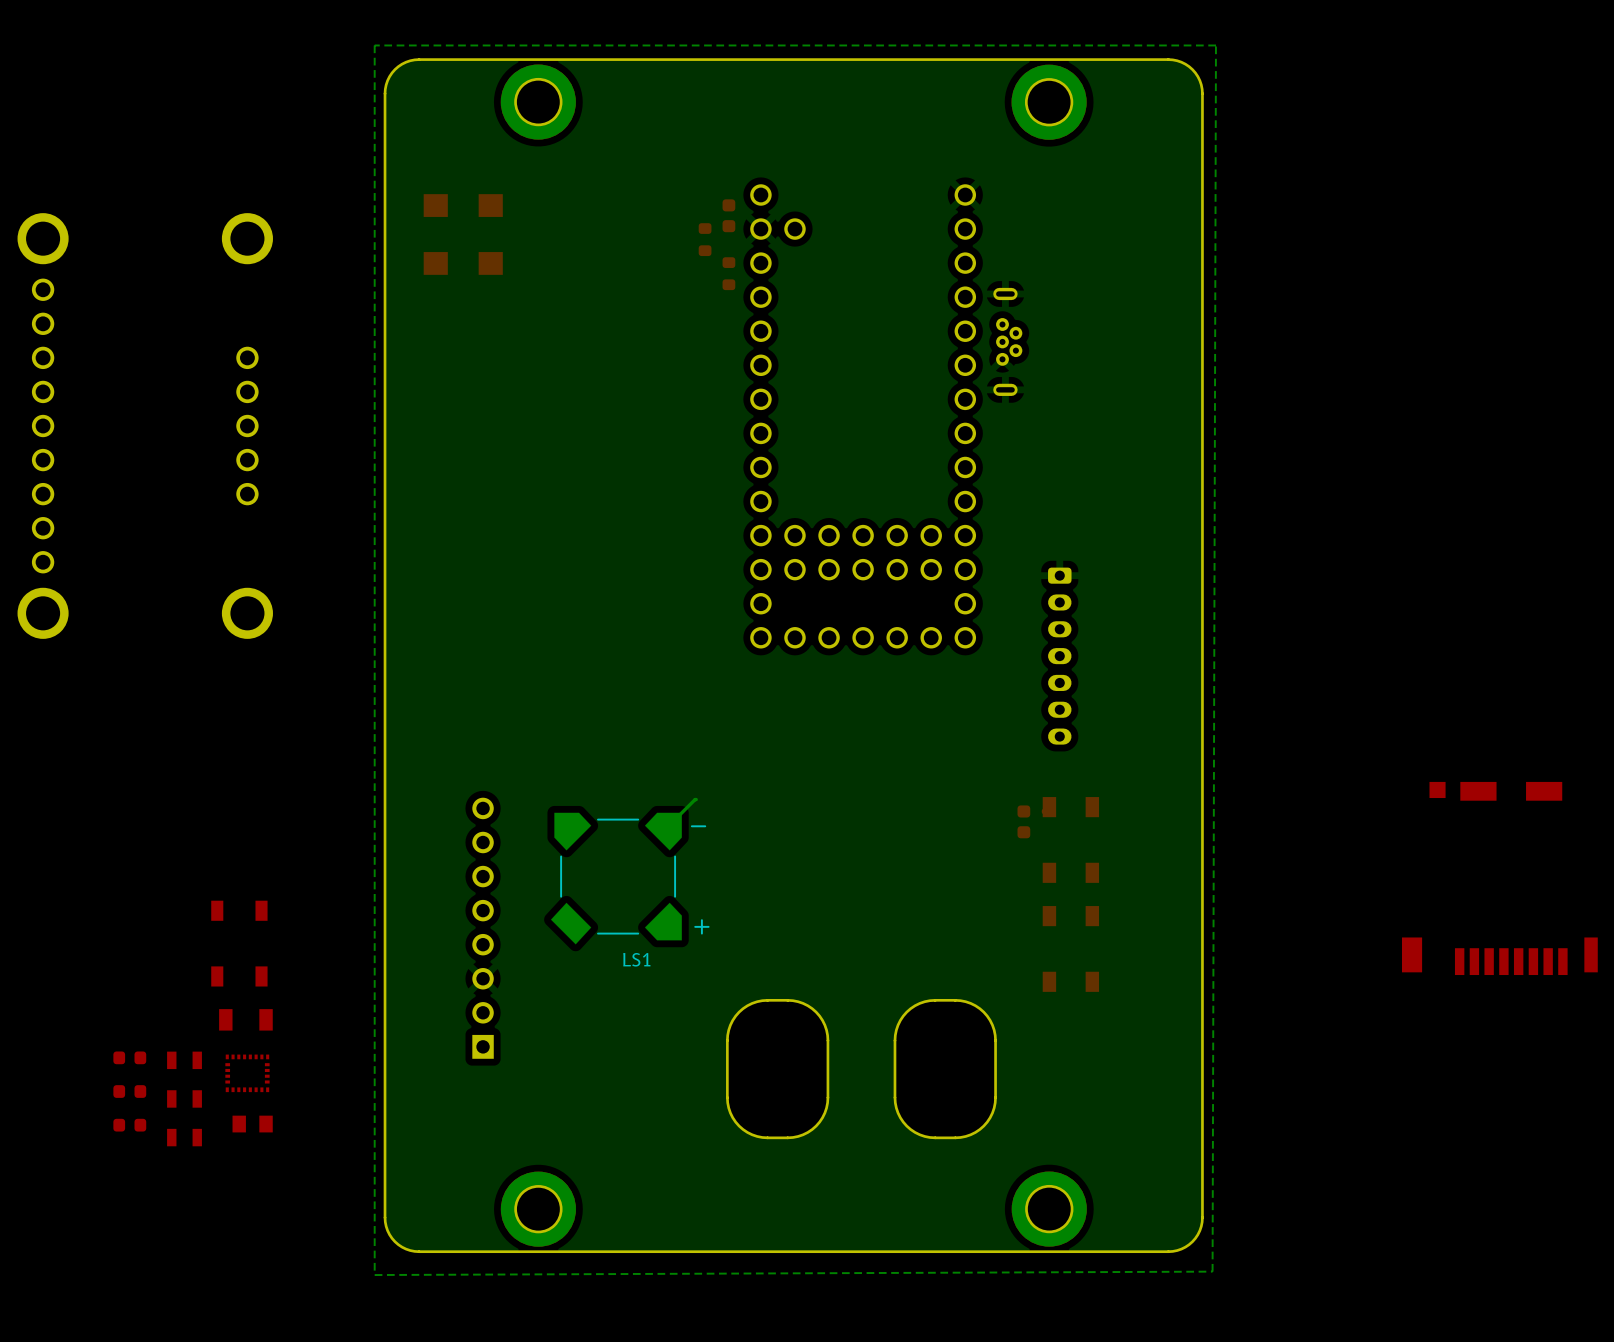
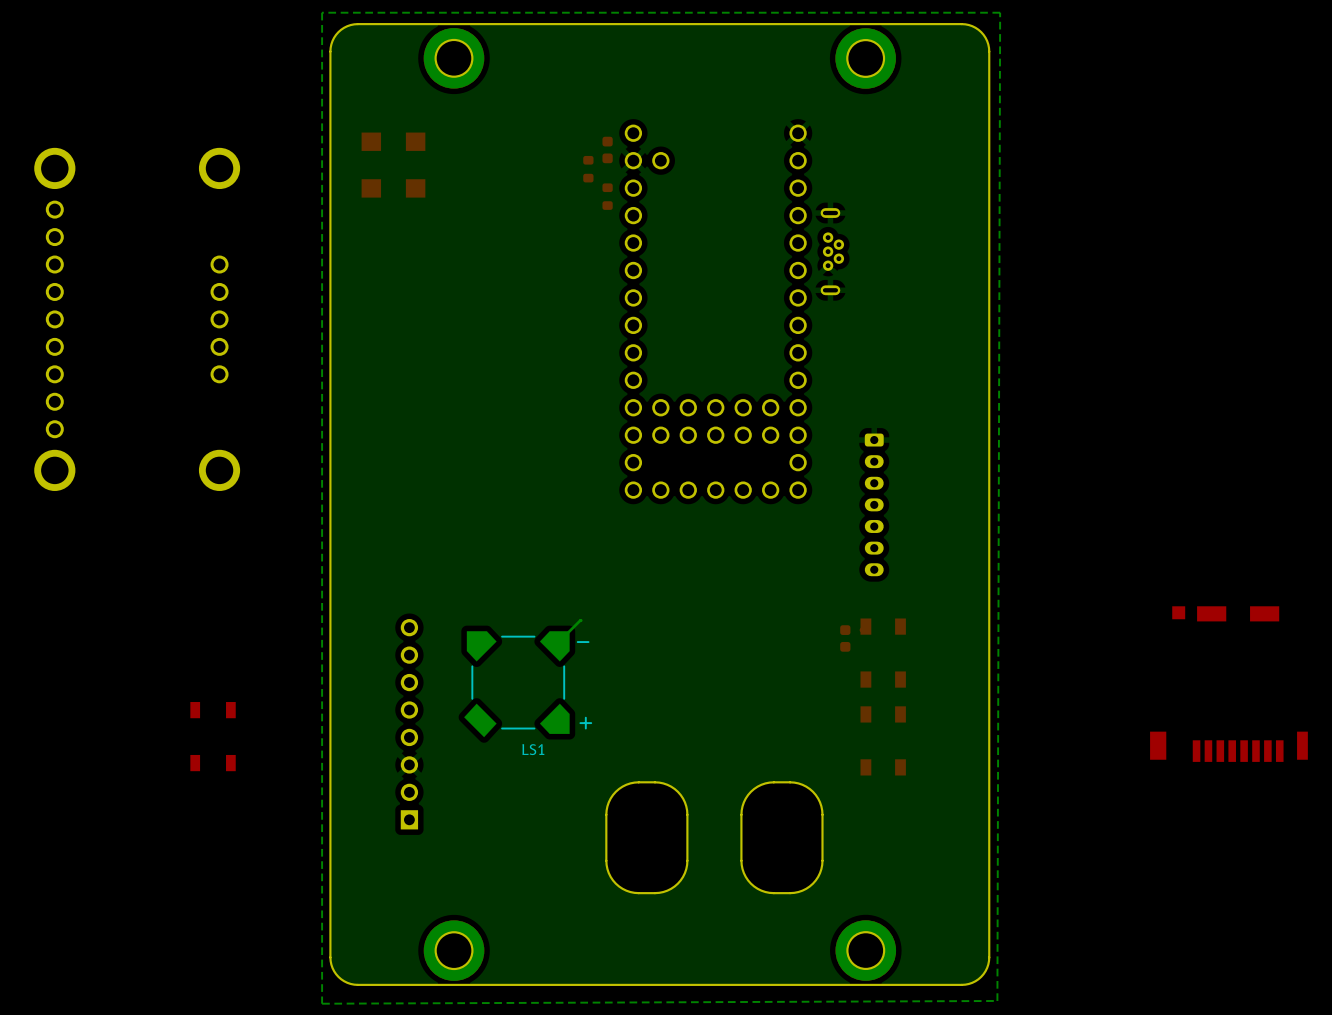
part: (245, 1019) -> none
part: (129, 1057) -> none
part: (184, 1060) -> none
part: (247, 1073) -> none
part: (129, 1091) -> none
part: (184, 1098) -> none
part: (252, 1124) -> none
part: (129, 1125) -> none
part: (184, 1137) -> none

